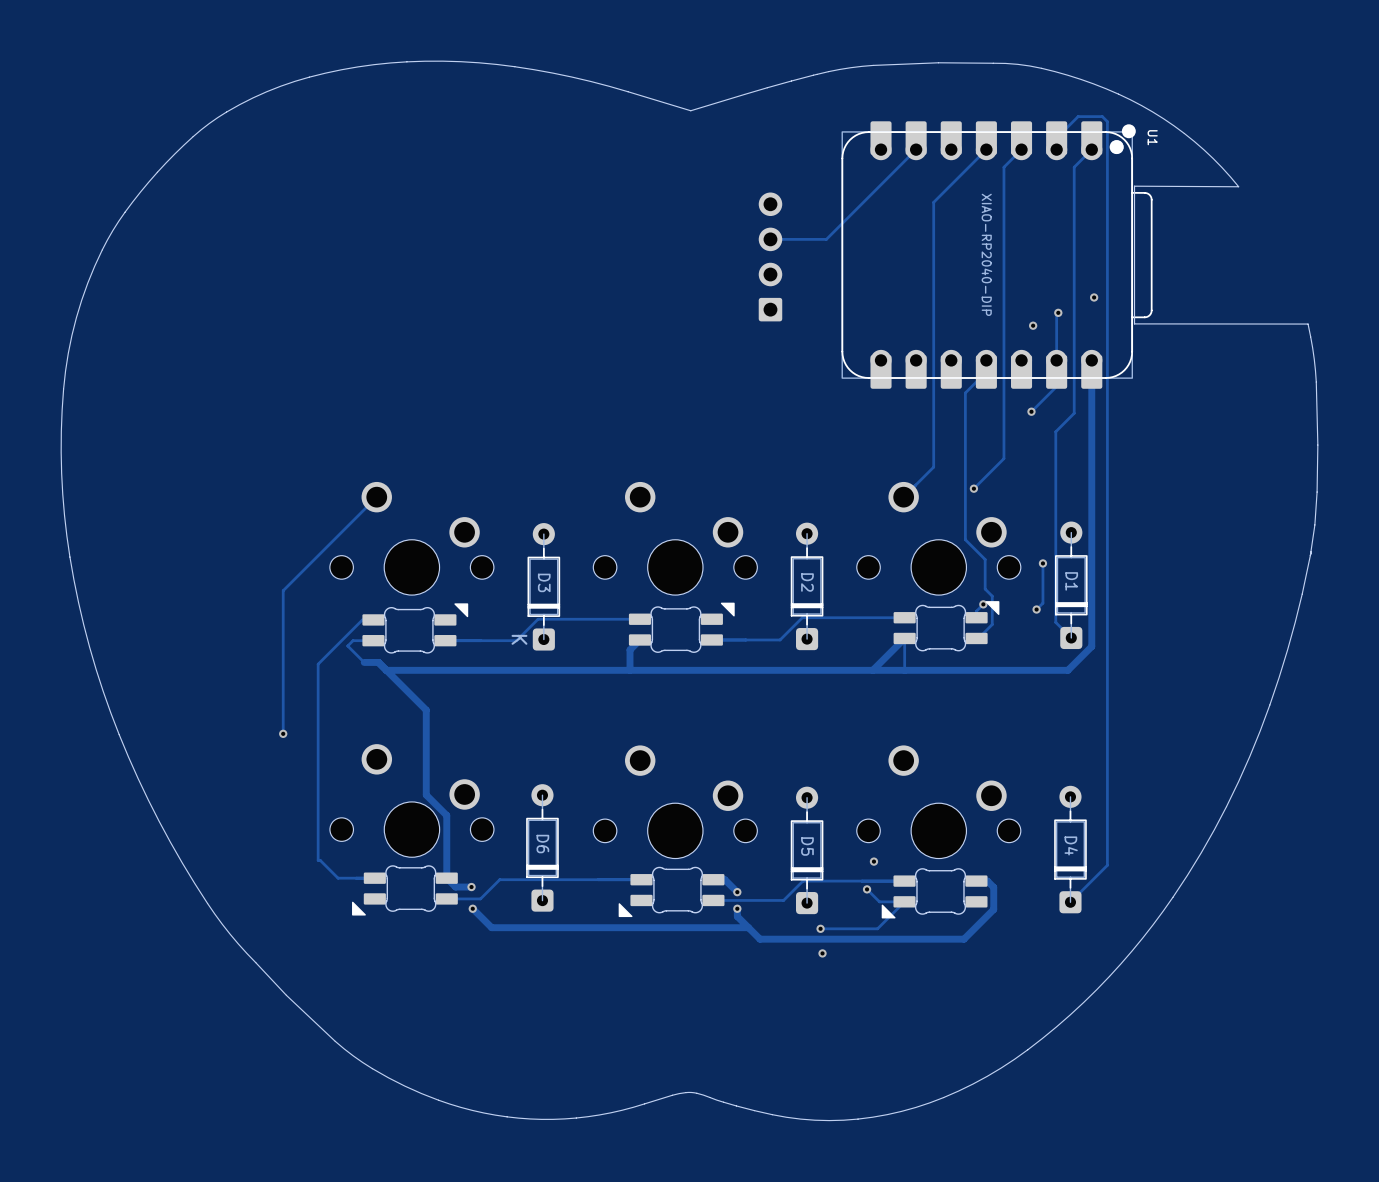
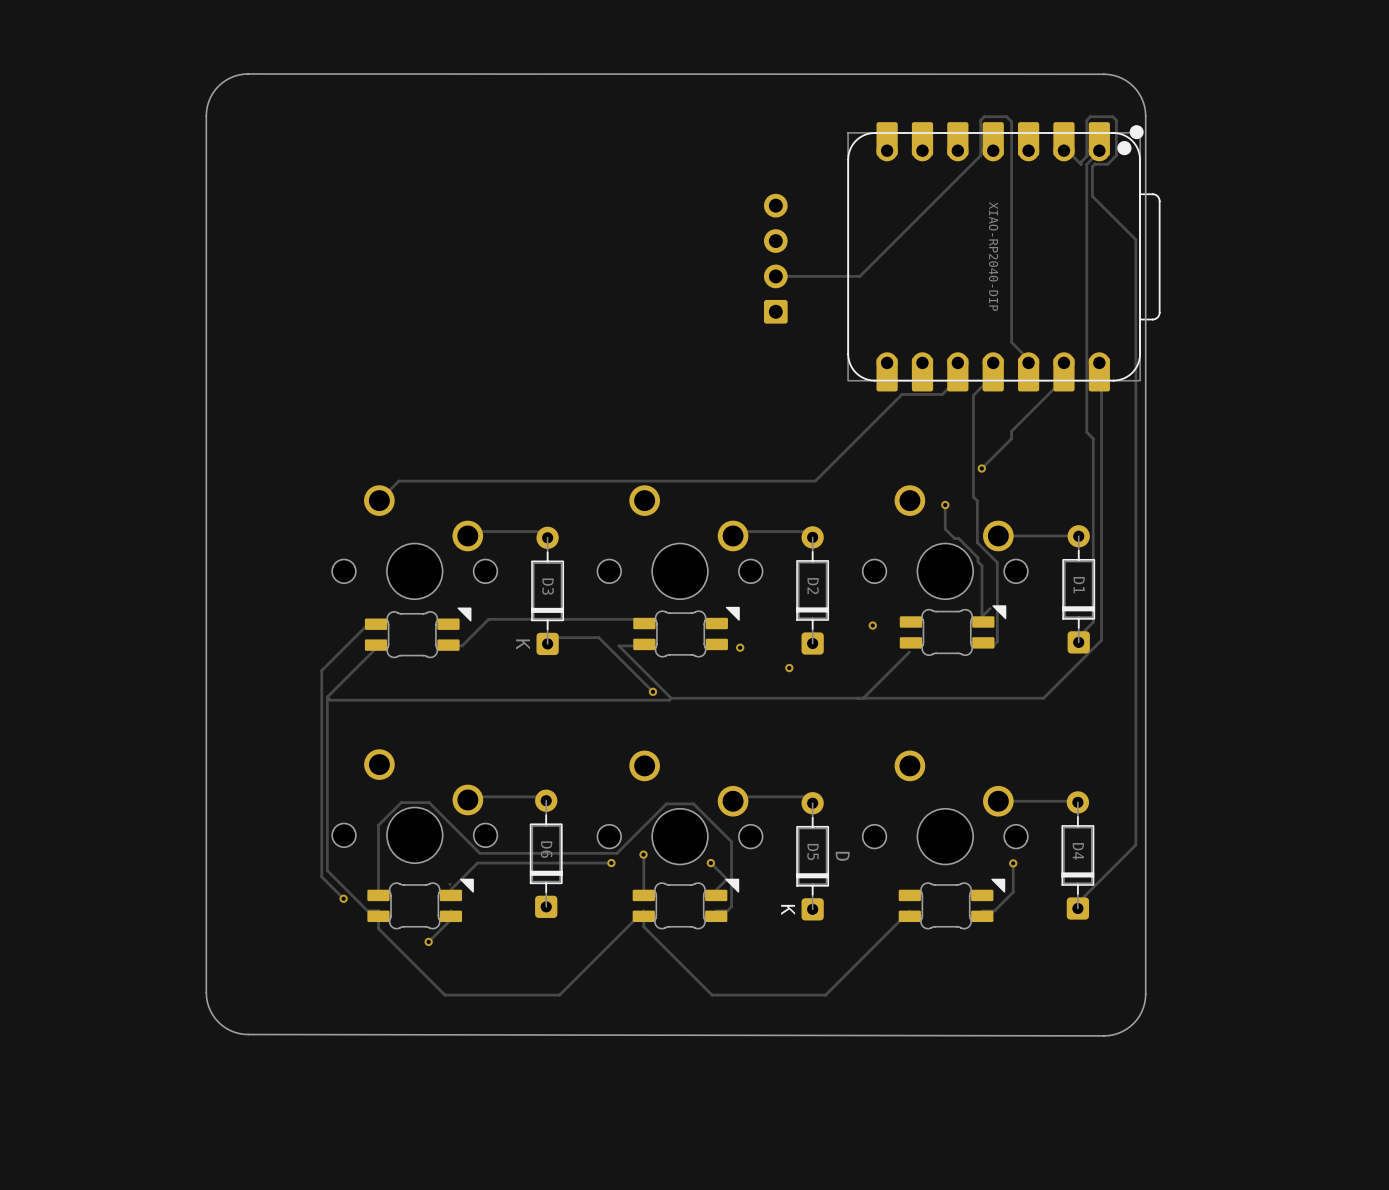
board edge: none -> (248, 73) (1103, 74) (1117, 76) (1133, 86) (1143, 102) (1145, 116) (1145, 994) (1143, 1007) (1133, 1023) (1122, 1031) (1103, 1035) (248, 1034) (234, 1032) (218, 1022) (210, 1010) (206, 992) (206, 115) (208, 101) (218, 86) (234, 76) (248, 73)
U1 name: U1 (1152, 137) -> none
track: (916, 138) (916, 149) (826, 239) (770, 239) -> none
track: (986, 138) (986, 149) (933, 202) (933, 467) (903, 497) (915, 485) -> none
track: (1021, 138) (1021, 149) (1003, 167) (1003, 458) (973, 488) -> none
track: (1091, 138) (1091, 149) (1074, 167) (1074, 413) (1055, 431) (1055, 622) (1071, 637) -> none
track: none -> (1066, 149) (1081, 164) (1087, 156) (1086, 120) (1090, 116) (1112, 116) (1116, 120) (1116, 155) (1107, 164) (1095, 163) (1092, 166) (1092, 196) (1135, 239) (1135, 844) (1077, 902)
track: none -> (1101, 149) (1086, 164) (1086, 432) (1093, 438) (1093, 622) (1077, 637)
track: (1056, 149) (1056, 138) (1078, 116) (1102, 116) (1107, 121) (1107, 865) (1070, 902) -> none
track: none -> (775, 276) (859, 276) (980, 155) (980, 120) (984, 116) (1006, 116) (1011, 121) (1011, 342) (1030, 361)
via: (1094, 297) -> none
track: (1058, 312) (1056, 314) (1056, 386) (1031, 411) -> none
via: (1058, 312) -> none
via: (1033, 325) -> none
track: none -> (1066, 361) (1066, 376) (1011, 431) (1011, 438) (981, 468)
track: none -> (1101, 361) (1101, 640) (1043, 698) (671, 698)
track: (986, 360) (986, 371) (965, 392) (965, 539) (985, 559) (985, 589) (992, 596) (992, 624) (976, 638) -> none
track: (1091, 360) (1091, 646) (1067, 670) (386, 670) -> none
track: none -> (995, 373) (973, 395) (973, 496) (977, 500) (977, 542) (997, 562) (997, 641) (993, 645) (982, 645)
via: (1031, 411) -> none
via: none -> (981, 468)
via: (973, 488) -> none
track: (376, 497) (283, 590) (283, 733) -> (379, 500) (398, 481) (815, 481) (901, 394) (942, 394) (960, 376) (960, 361)
track: none -> (945, 505) (945, 529) (954, 538) (958, 538) (978, 557) (978, 561) (982, 565) (982, 625)
via: none -> (945, 505)
track: none -> (547, 531) (472, 531) (467, 535)
track: none -> (812, 531) (737, 531) (733, 535)
track: none -> (1077, 531) (1073, 535) (998, 535)
board edge: (1311, 551) (1302, 593) (1295, 622) (1269, 705) (1238, 781) (1201, 852) (1163, 911) (1120, 963) (1070, 1014) (1014, 1059) (972, 1084) (929, 1102) (887, 1114) (858, 1119) (815, 1120) (786, 1117) (688, 1092) (672, 1095) (622, 1110) (587, 1116) (541, 1119) (495, 1115) (461, 1107) (421, 1093) (372, 1068) (344, 1048) (286, 995) (230, 934) (207, 903) (170, 842) (138, 778) (110, 713) (96, 669) (78, 602) (66, 536) (61, 473) (62, 410) (68, 353) (81, 300) (102, 249) (118, 221) (148, 181) (183, 145) (217, 117) (253, 97) (294, 81) (341, 69) (390, 62) (442, 61) (478, 62) (514, 66) (571, 77) (690, 110) (791, 81) (850, 67) (938, 62) (1005, 63) (1029, 65) (1093, 83) (1152, 111) (1184, 133) (1203, 149) (1238, 186) (1134, 186) (1134, 323) (1308, 324) (1315, 370) (1317, 445) (1314, 524) (1310, 555) -> none
track: (1042, 563) (1042, 603) (1036, 609) -> none
via: (1042, 563) -> none
via: (983, 604) -> none
via: (1036, 609) -> none
track: (904, 617) (802, 617) (780, 639) (711, 639) -> none
track: (373, 619) (362, 619) (318, 664) (318, 860) (338, 878) (374, 878) -> none
track: (639, 619) (538, 619) (516, 640) (445, 640) -> none
track: none -> (378, 625) (367, 625) (321, 670) (321, 876) (343, 898)
track: none -> (643, 625) (638, 619) (488, 619) (462, 645) (450, 645)
via: none -> (872, 625)
track: none -> (547, 637) (598, 637) (652, 691)
track: (639, 639) (630, 649) (630, 670) -> none
track: (373, 640) (353, 640) (347, 645) (364, 662) (378, 662) (386, 670) -> none
track: none -> (378, 645) (327, 697)
track: none -> (643, 645) (618, 645) (671, 698)
via: none -> (740, 647)
track: none -> (909, 652) (863, 698)
via: none -> (789, 668)
track: (386, 670) (426, 710) (426, 795) (446, 815) (446, 878) (455, 887) (471, 887) -> none
track: (904, 670) (904, 638) (872, 670) -> none
via: none -> (652, 691)
track: none -> (327, 697) (330, 700) (669, 700) (671, 698)
track: none -> (327, 697) (327, 870) (367, 910) (378, 910) (378, 928) (445, 995) (559, 995) (643, 910) (643, 926) (712, 995) (825, 995) (909, 910)
via: (283, 733) -> none
track: none -> (547, 796) (470, 796) (467, 799)
track: none -> (812, 796) (737, 796) (733, 801)
track: none -> (1077, 796) (1073, 801) (998, 801)
track: none -> (643, 854) (643, 890)
via: none -> (643, 854)
D5 value: none -> D (842, 856)
track: none -> (611, 863) (477, 863) (450, 889)
via: none -> (611, 863)
track: none -> (710, 863) (725, 878) (716, 890)
via: none -> (710, 863)
track: none -> (1013, 863) (1013, 892) (994, 910) (982, 910)
via: none -> (1013, 863)
via: (873, 861) -> none
track: (641, 879) (499, 879) (480, 898) (446, 898) -> none
track: (714, 879) (724, 879) (737, 892) -> none
track: (904, 881) (802, 881) (783, 900) (713, 900) -> none
track: (976, 881) (987, 881) (993, 887) (993, 909) (964, 939) (760, 939) (737, 916) (737, 908) -> none
track: none -> (378, 889) (378, 825) (401, 802) (429, 802) (479, 853) (616, 853) (666, 803) (693, 803) (731, 841) (731, 906) (727, 910) (716, 910)
via: (471, 887) -> none
track: (867, 889) (879, 901) (904, 901) (877, 928) (820, 928) -> none
via: (867, 889) -> none
part rotation: 0° (404, 890) -> 180° (420, 904)
part rotation: 0° (671, 891) -> 180° (685, 904)
via: none -> (343, 898)
via: (737, 892) -> none
part rotation: 0° (934, 893) -> 180° (951, 904)
D5 text: none -> K (788, 909)
track: none -> (450, 910) (450, 919) (428, 941)
track: (472, 908) (491, 927) (748, 927) -> none
via: (472, 908) -> none
via: (737, 908) -> none
via: (820, 928) -> none
via: none -> (428, 941)
via: (822, 953) -> none

